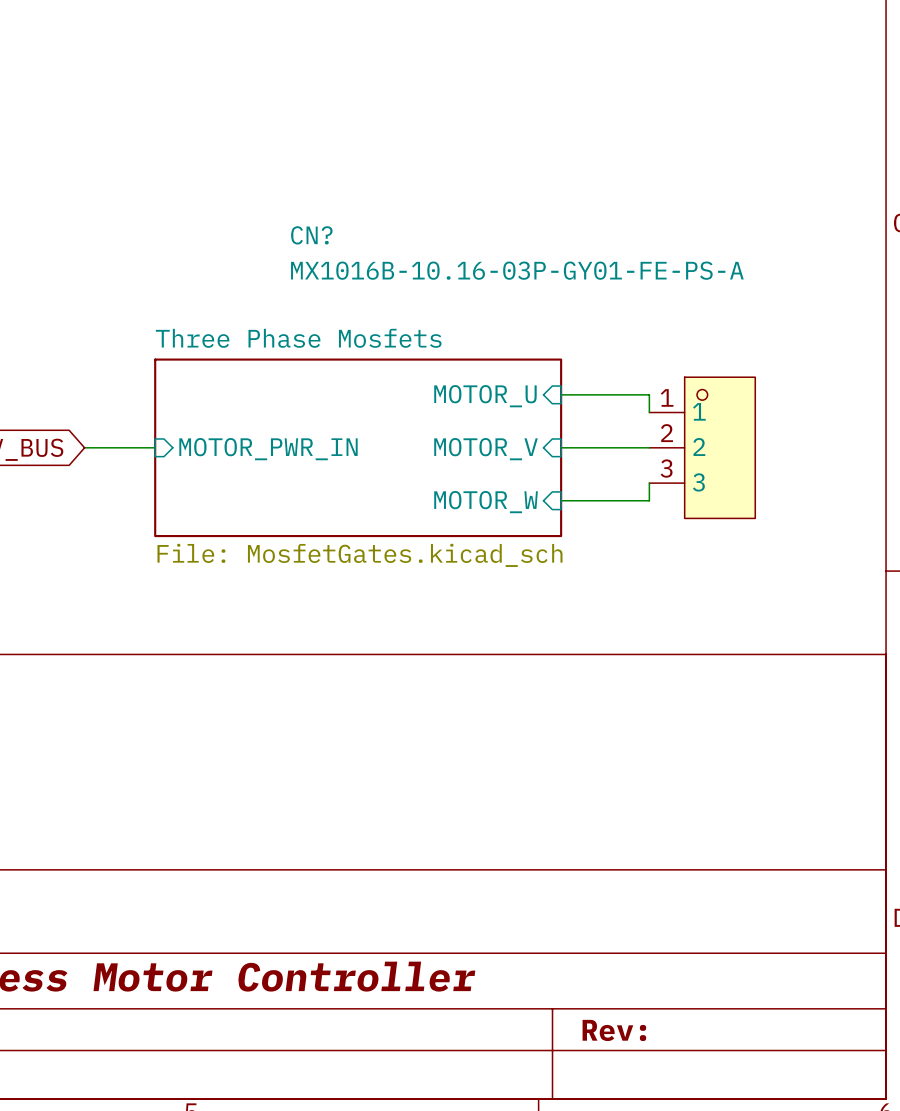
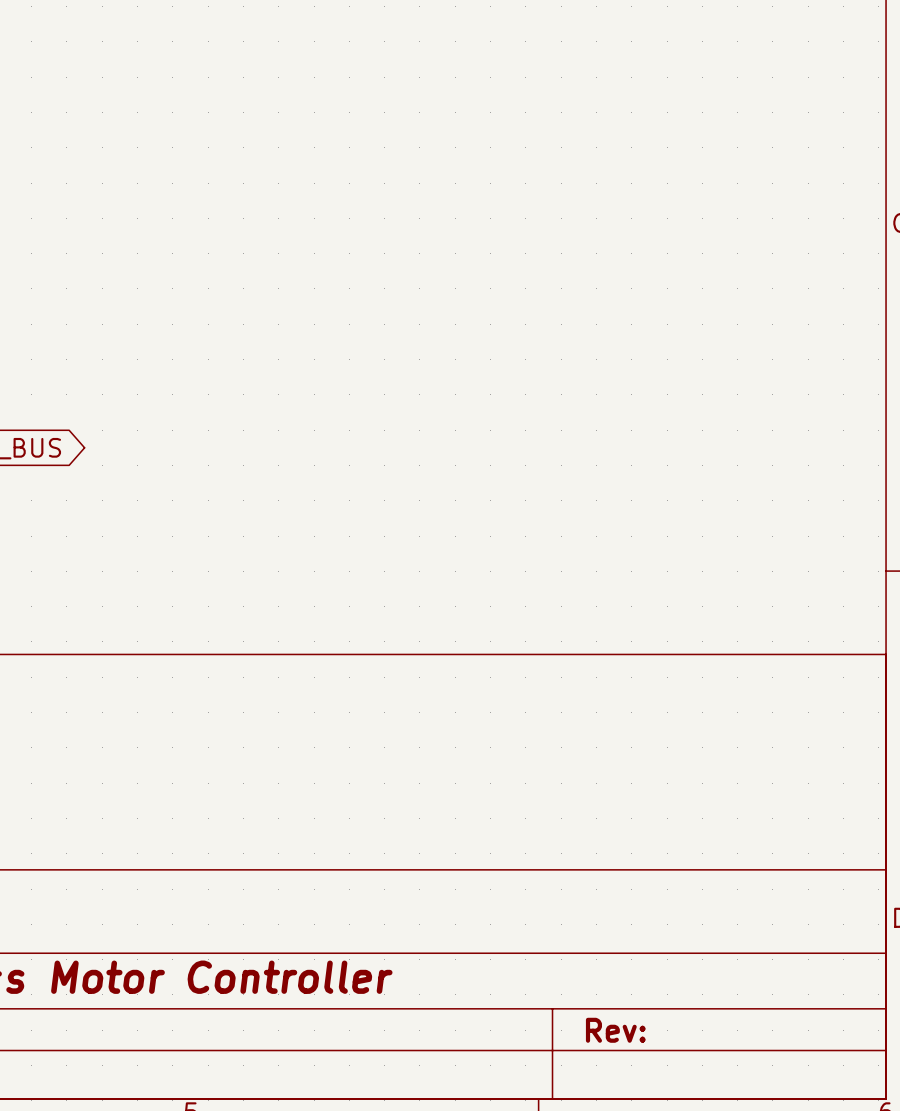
wire: (561, 394) (649, 394) (649, 412) -> none
sheet pin: MOTOR_U (485, 396) -> none
wire: (84, 447) (155, 447) -> none
sheet Three Phase Mosfets: File: MosfetGates.kicad_sch (358, 447) -> none
wire: (561, 447) (649, 447) -> none
CN?: MX1016B-10.16-03P-GY01-FE-PS-A (702, 447) -> none
sheet pin: MOTOR_PWR_IN (268, 449) -> none
sheet pin: MOTOR_V (486, 449) -> none
wire: (649, 483) (649, 500) (561, 500) -> none
sheet pin: MOTOR_W (486, 502) -> none

